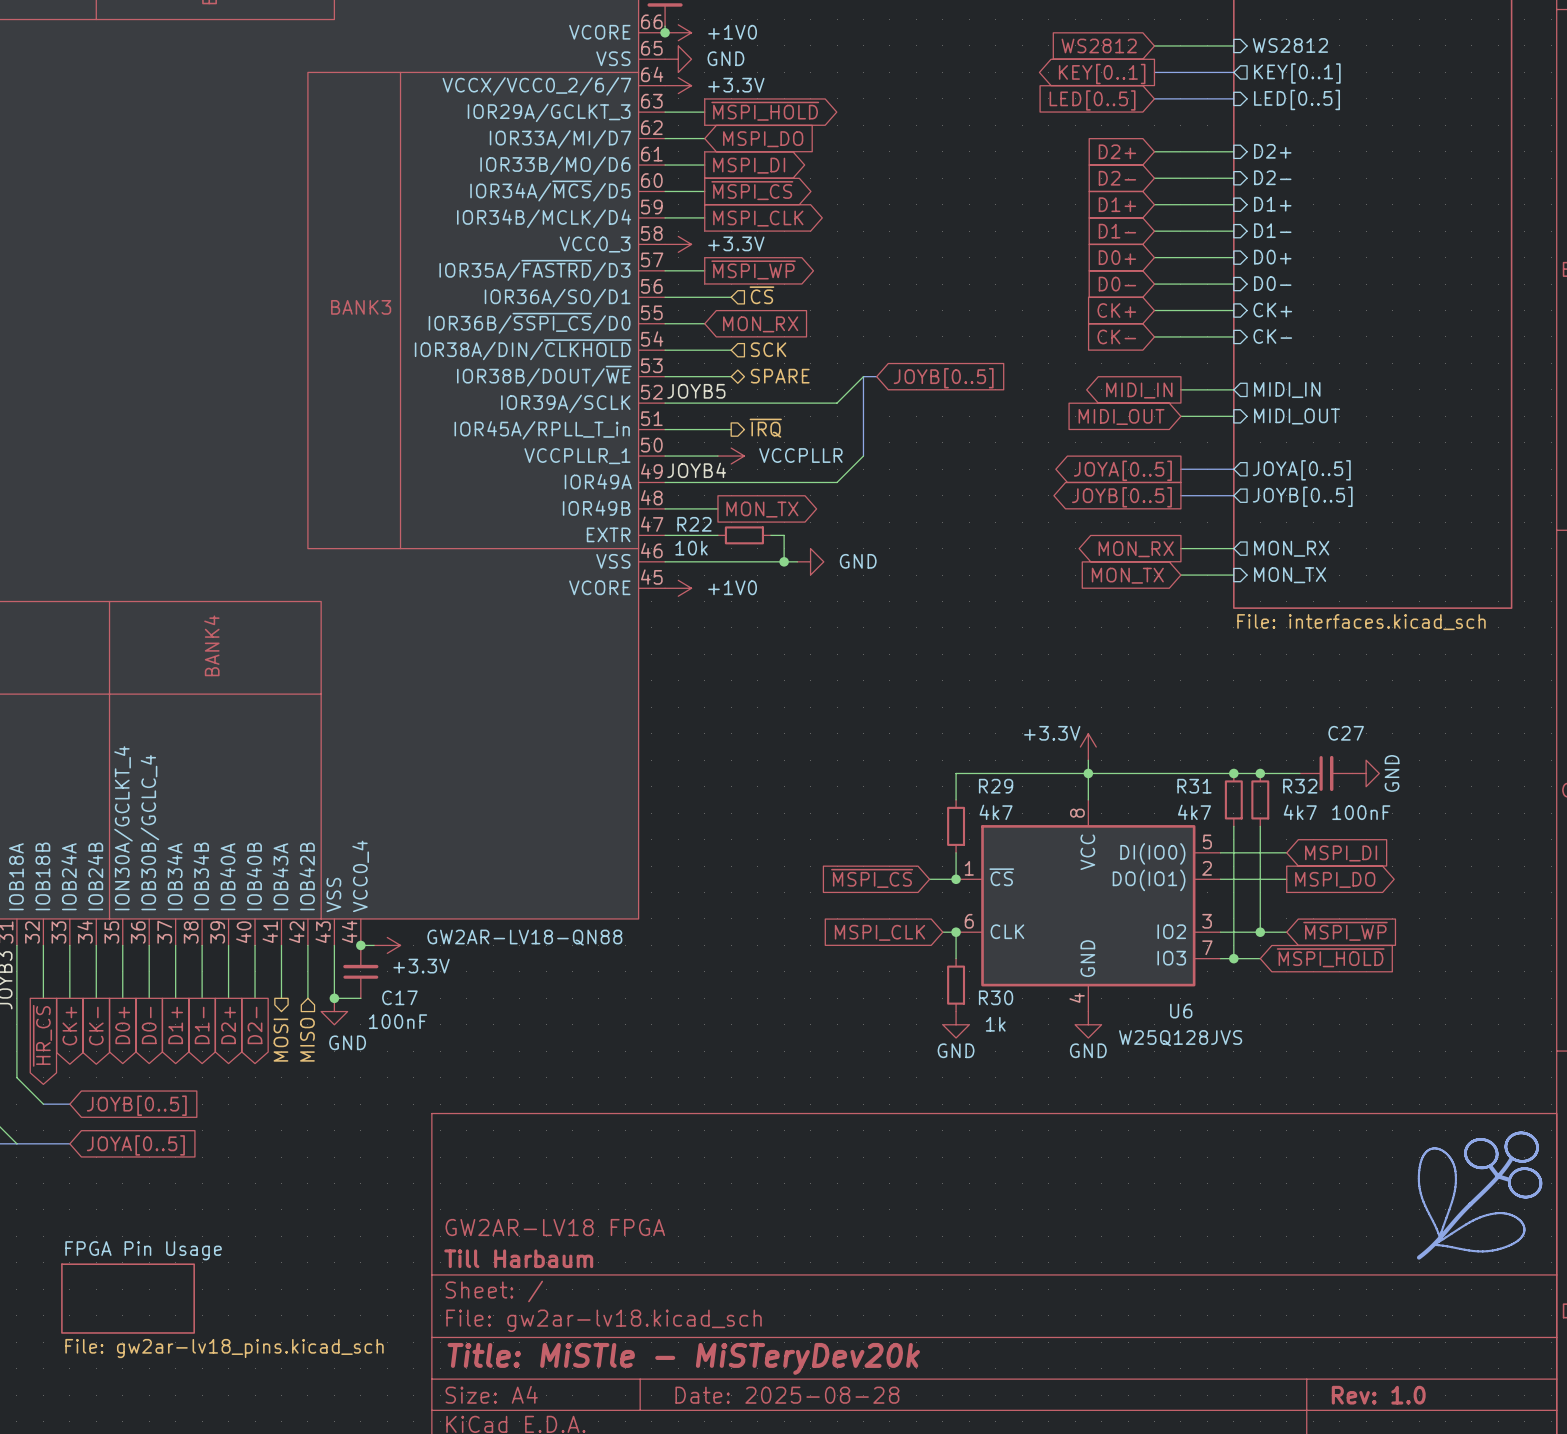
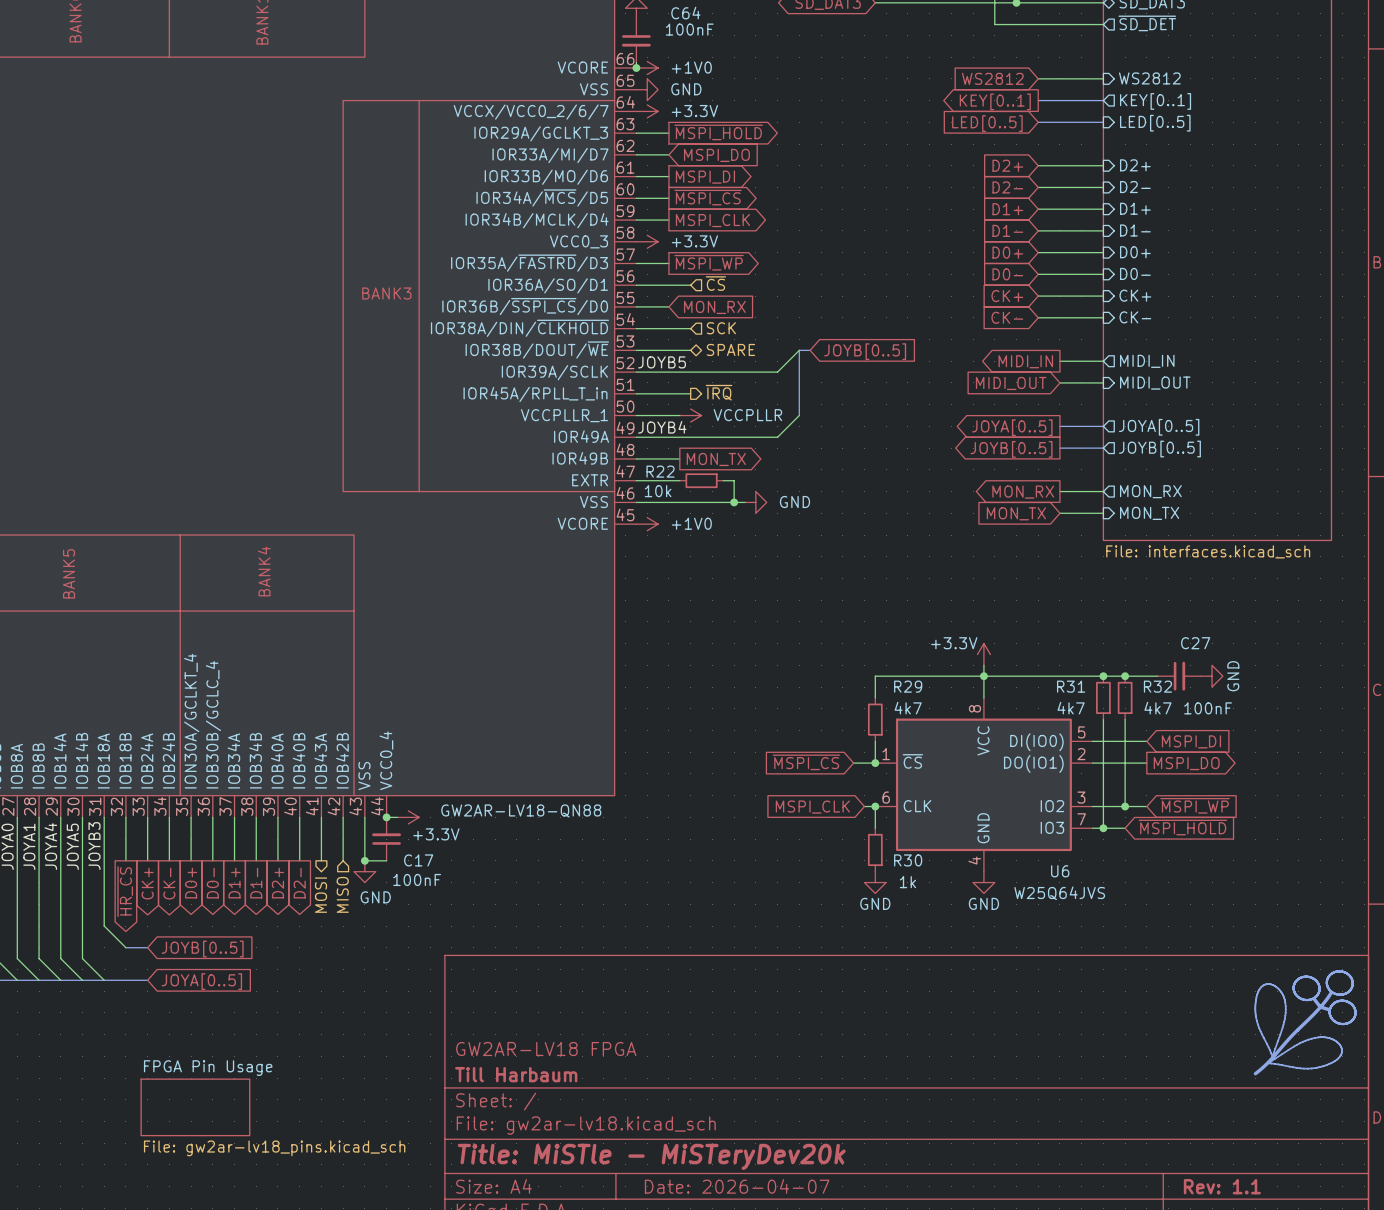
U6 value: W25Q128JVS (1180, 1038) -> W25Q64JVS (1059, 893)
title block: Date: 2025-08-28 (787, 1395) -> Date: 2026-04-07 (737, 1186)
title block: Rev: 1.0 (1378, 1395) -> Rev: 1.1 (1222, 1186)

